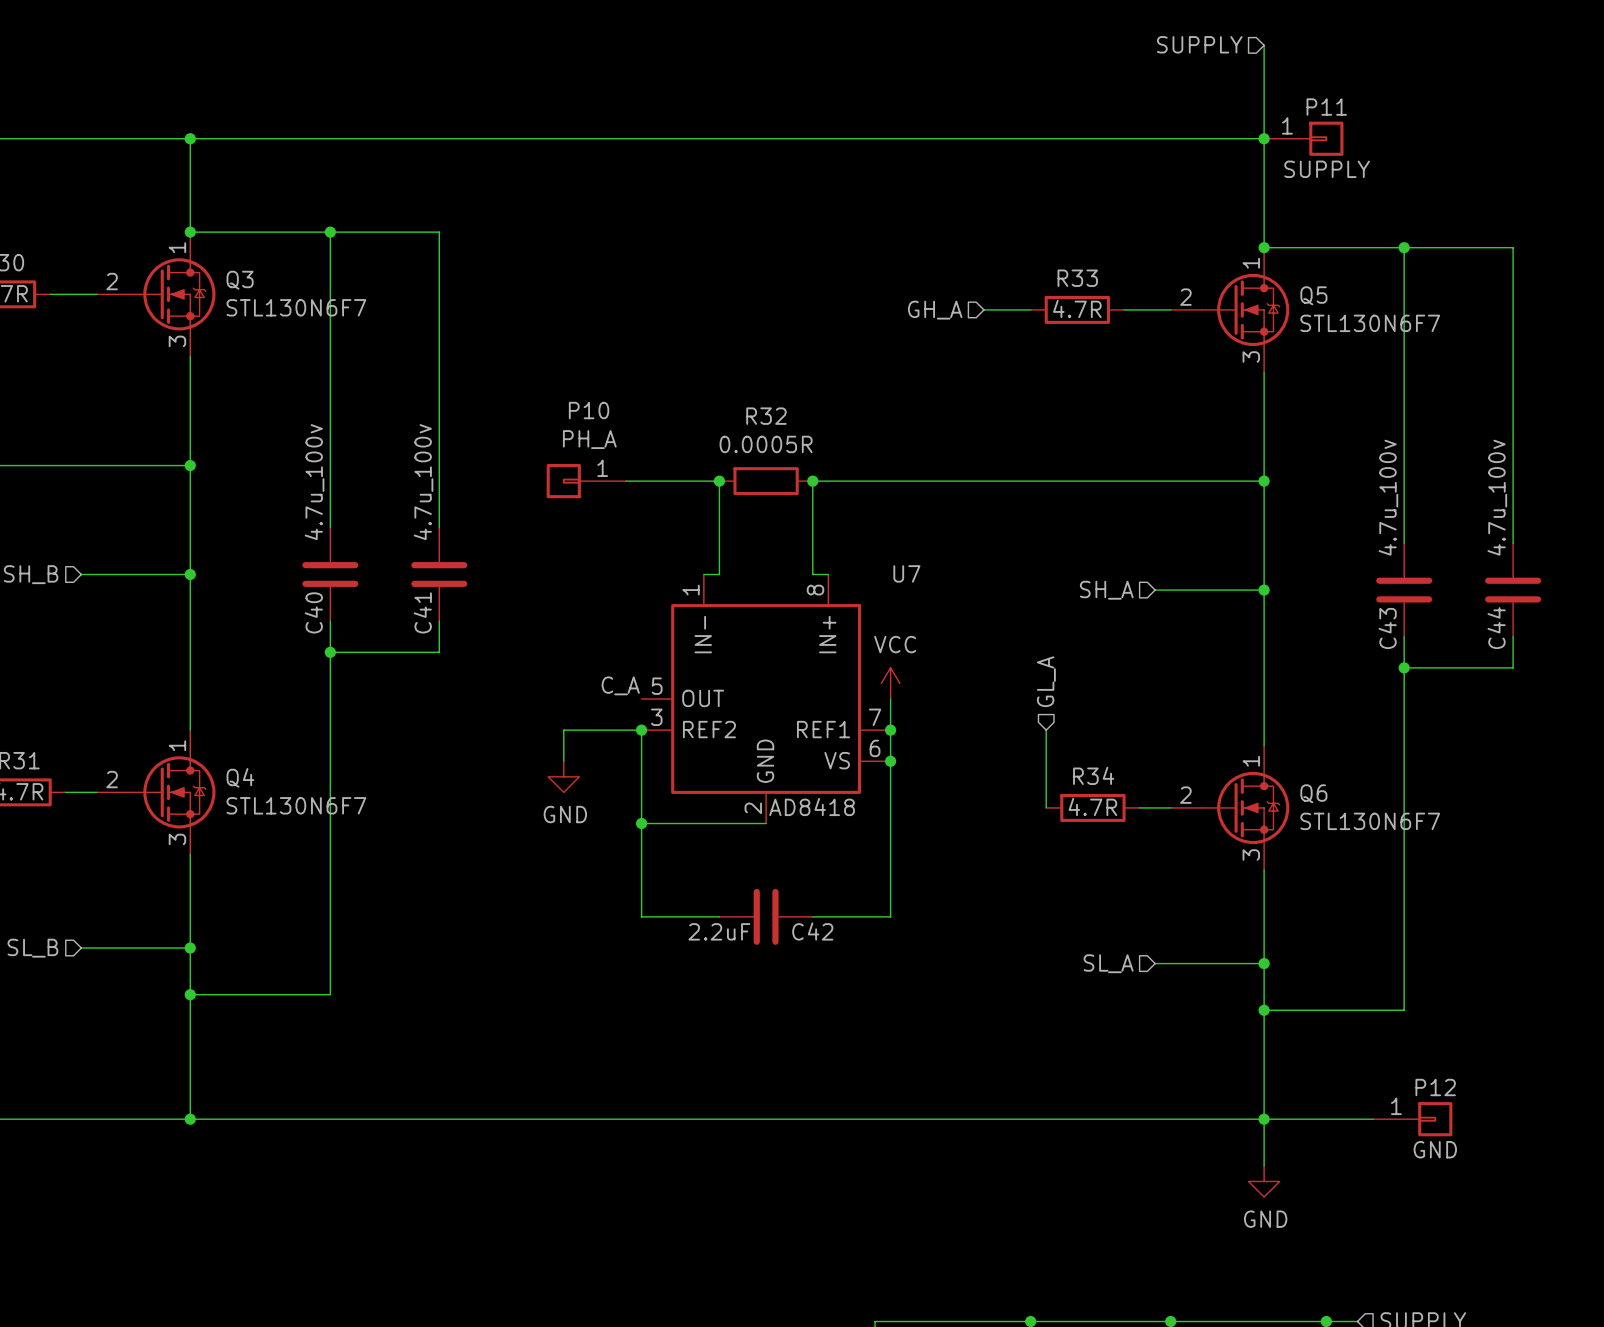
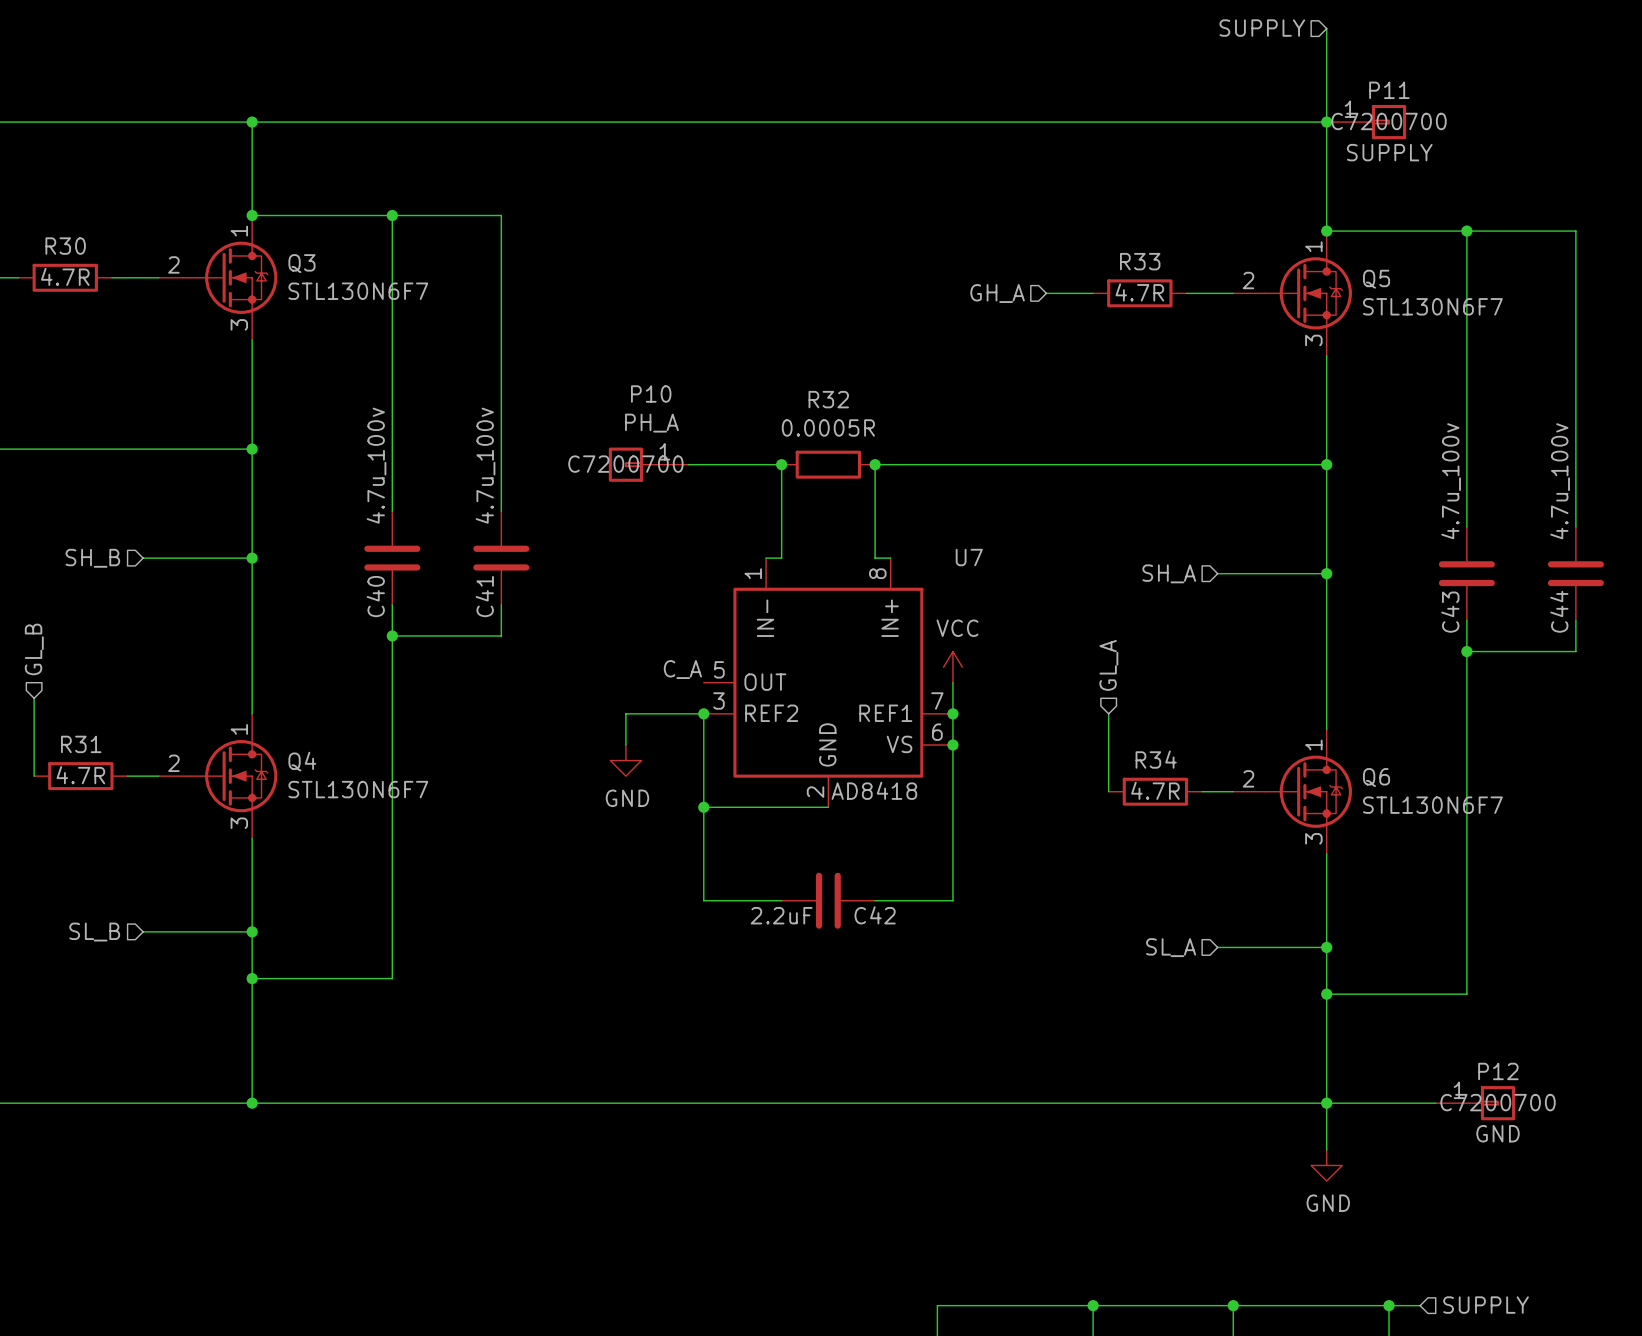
P11 text: none -> C7200700 (1389, 121)
P10 text: none -> C7200700 (625, 464)
P12 text: none -> C7200700 (1498, 1102)

